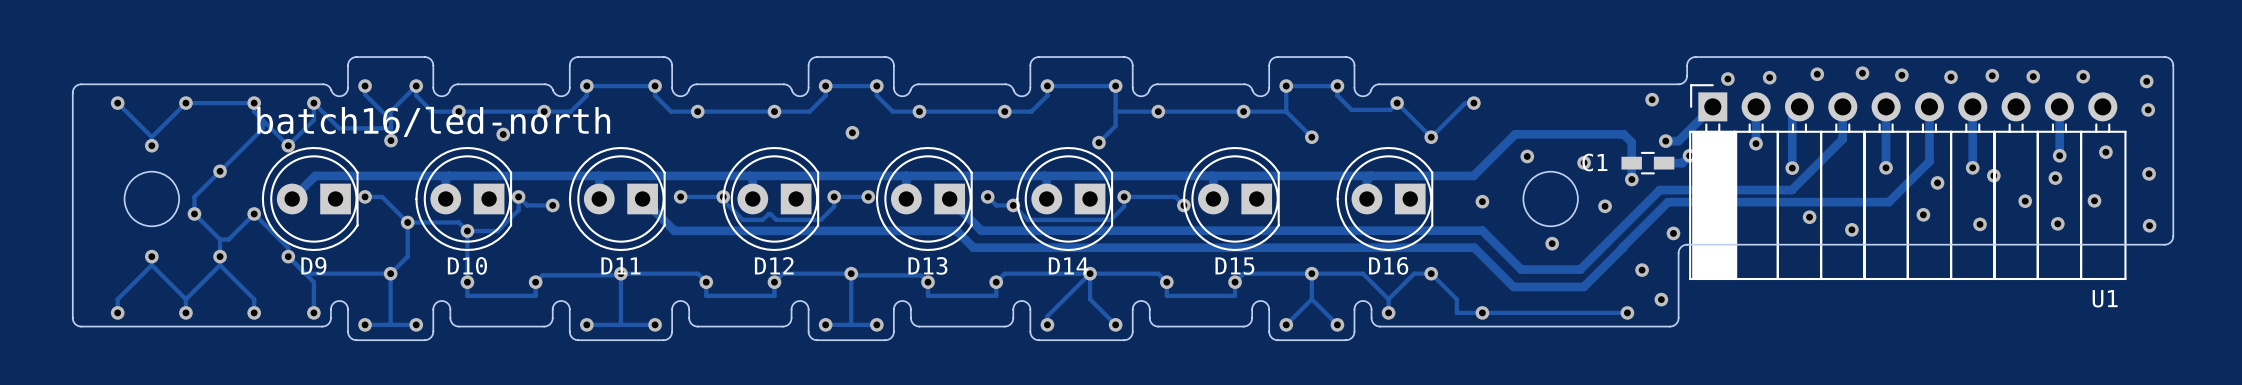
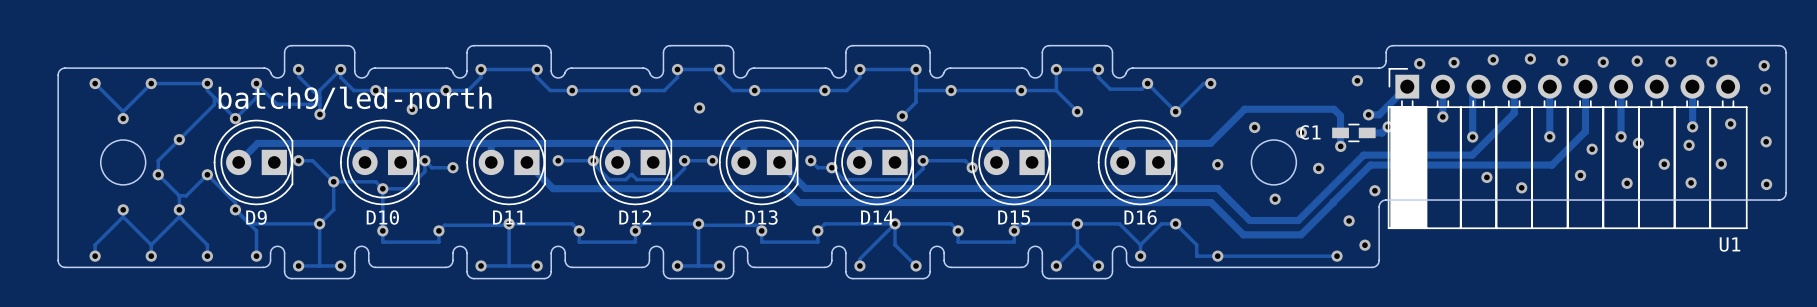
text: batch16/led-north (433, 121) -> batch9/led-north (355, 99)

